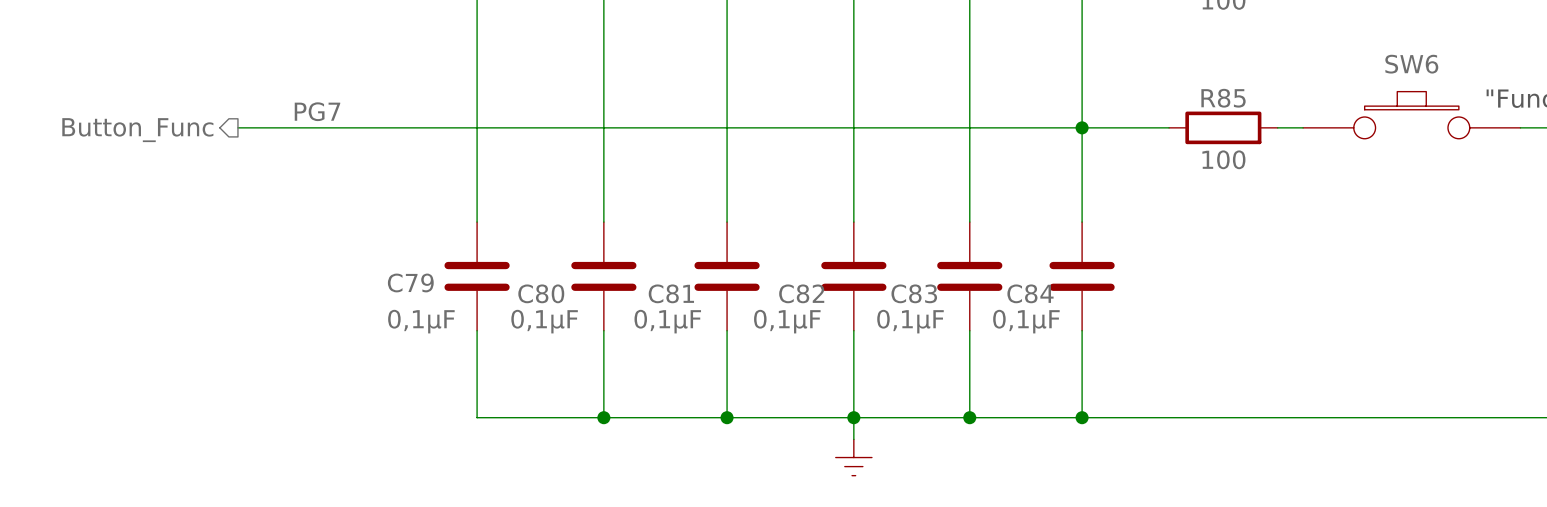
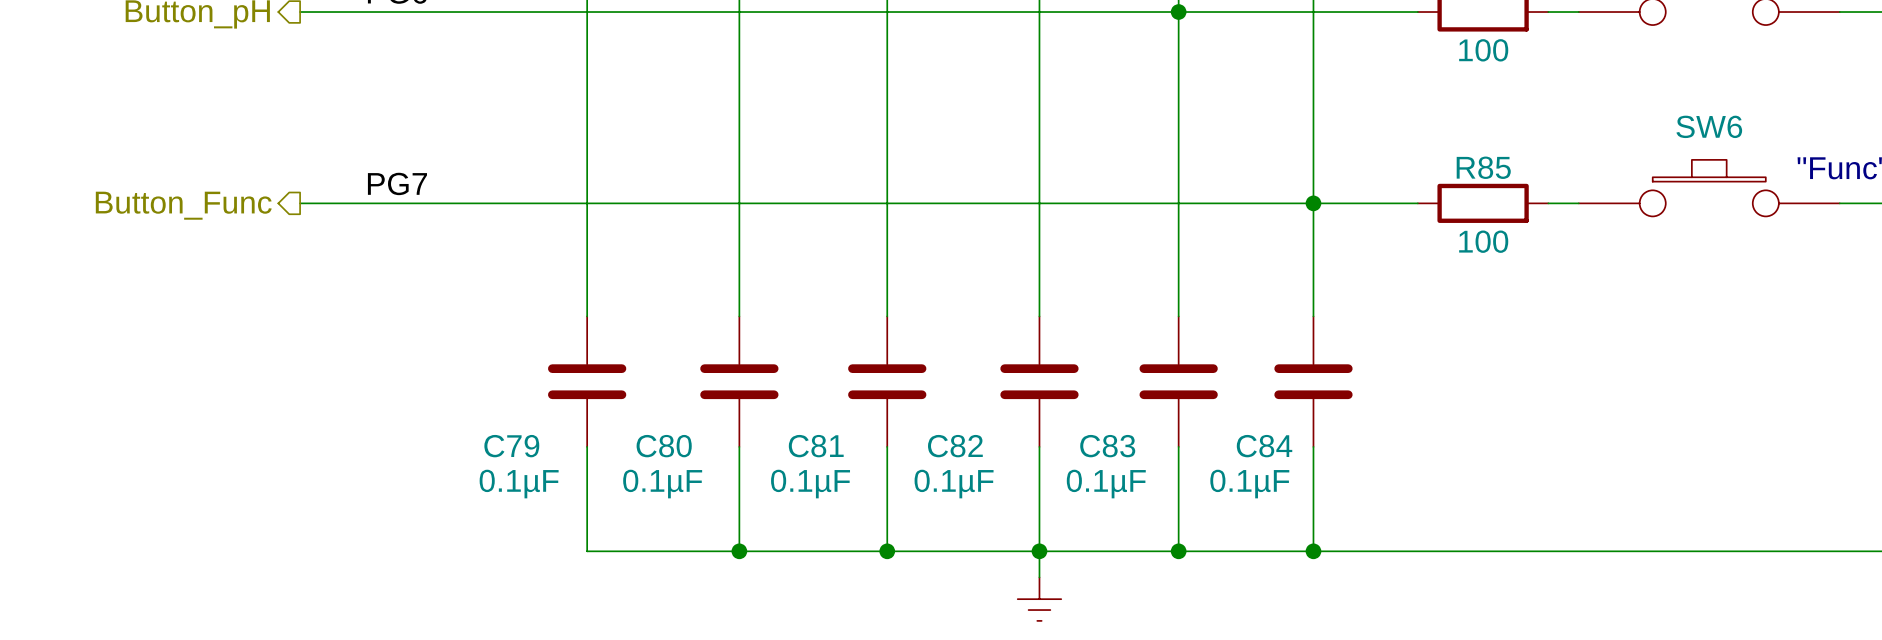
C79 name position: C79 (410, 282) -> C79 (511, 446)
C80 name position: C80 (541, 293) -> C80 (664, 446)
C81 name position: C81 (671, 293) -> C81 (816, 446)
C82 name position: C82 (801, 293) -> C82 (955, 446)
C83 name position: C83 (914, 293) -> C83 (1107, 446)
C84 name position: C84 (1030, 293) -> C84 (1264, 446)
C79 value: 0,1µF (421, 321) -> 0.1µF (519, 484)
C80 value: 0,1µF (544, 321) -> 0.1µF (662, 484)
C81 value: 0,1µF (667, 321) -> 0.1µF (810, 484)
C82 value: 0,1µF (787, 321) -> 0.1µF (954, 484)
C83 value: 0,1µF (910, 321) -> 0.1µF (1106, 484)
C84 value: 0,1µF (1026, 321) -> 0.1µF (1249, 484)

